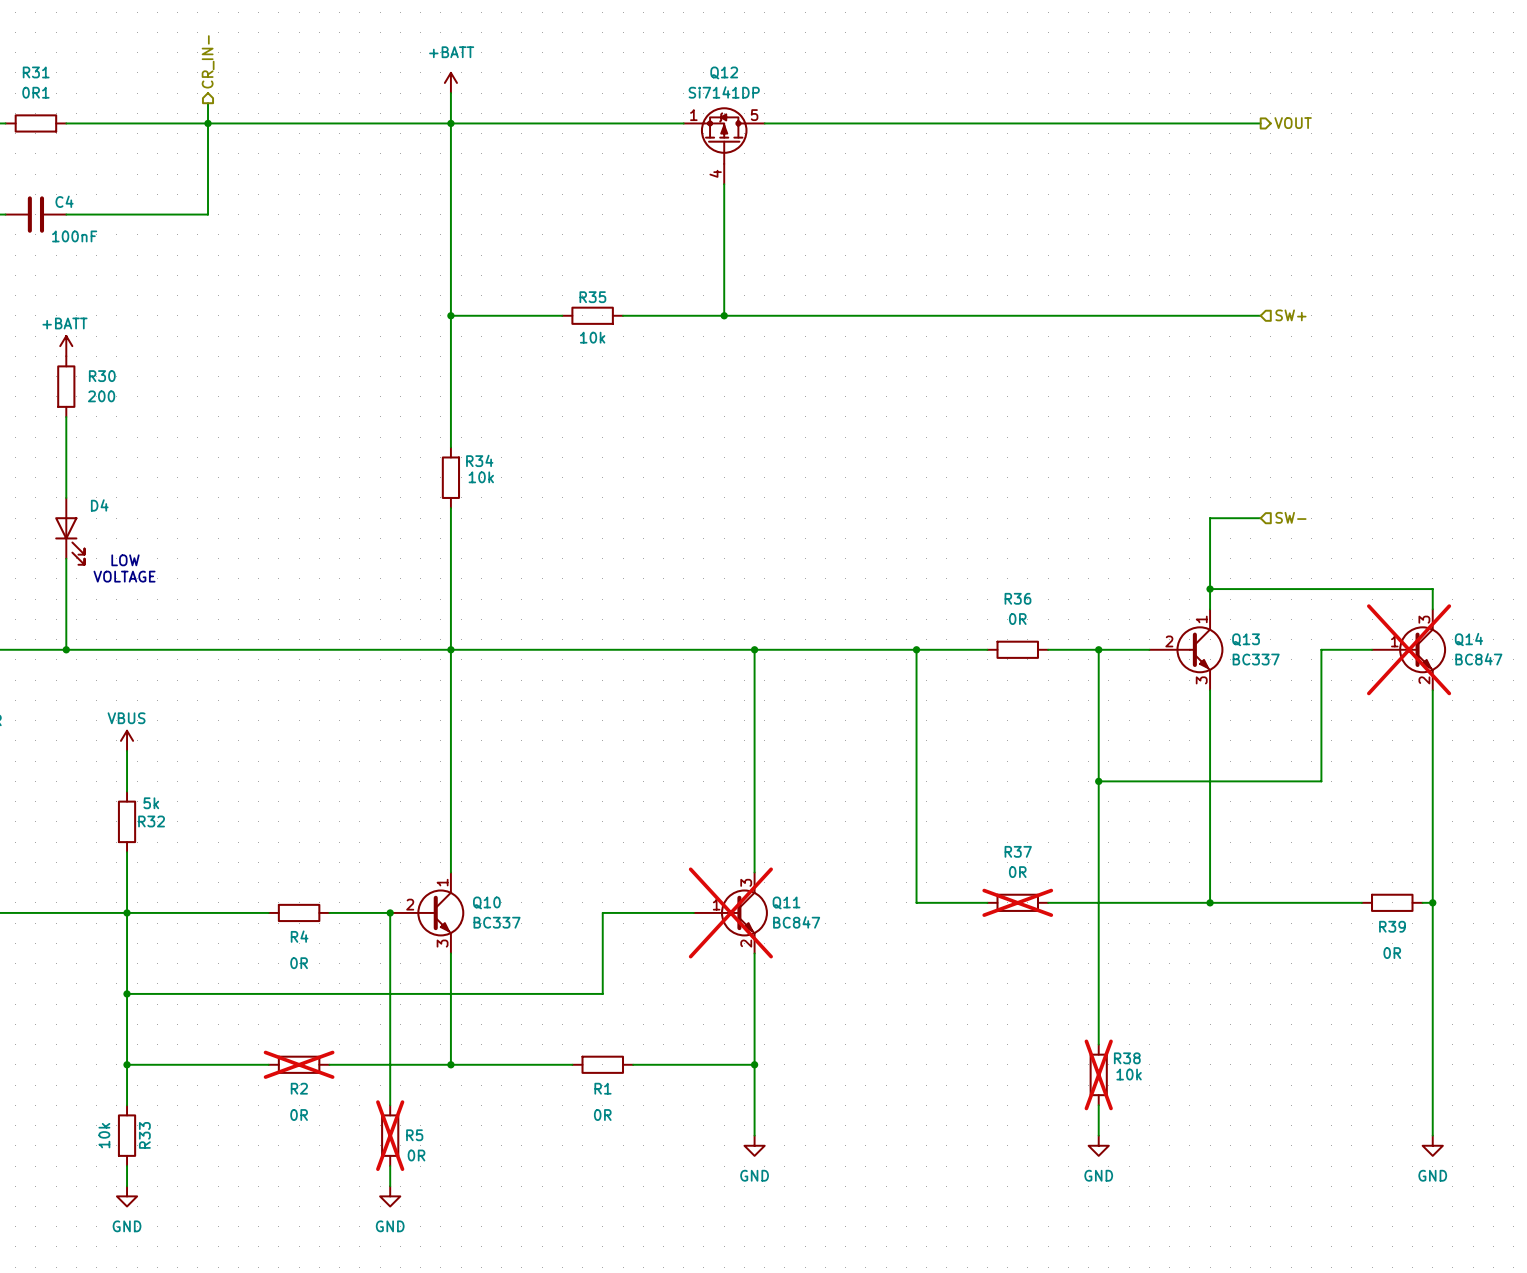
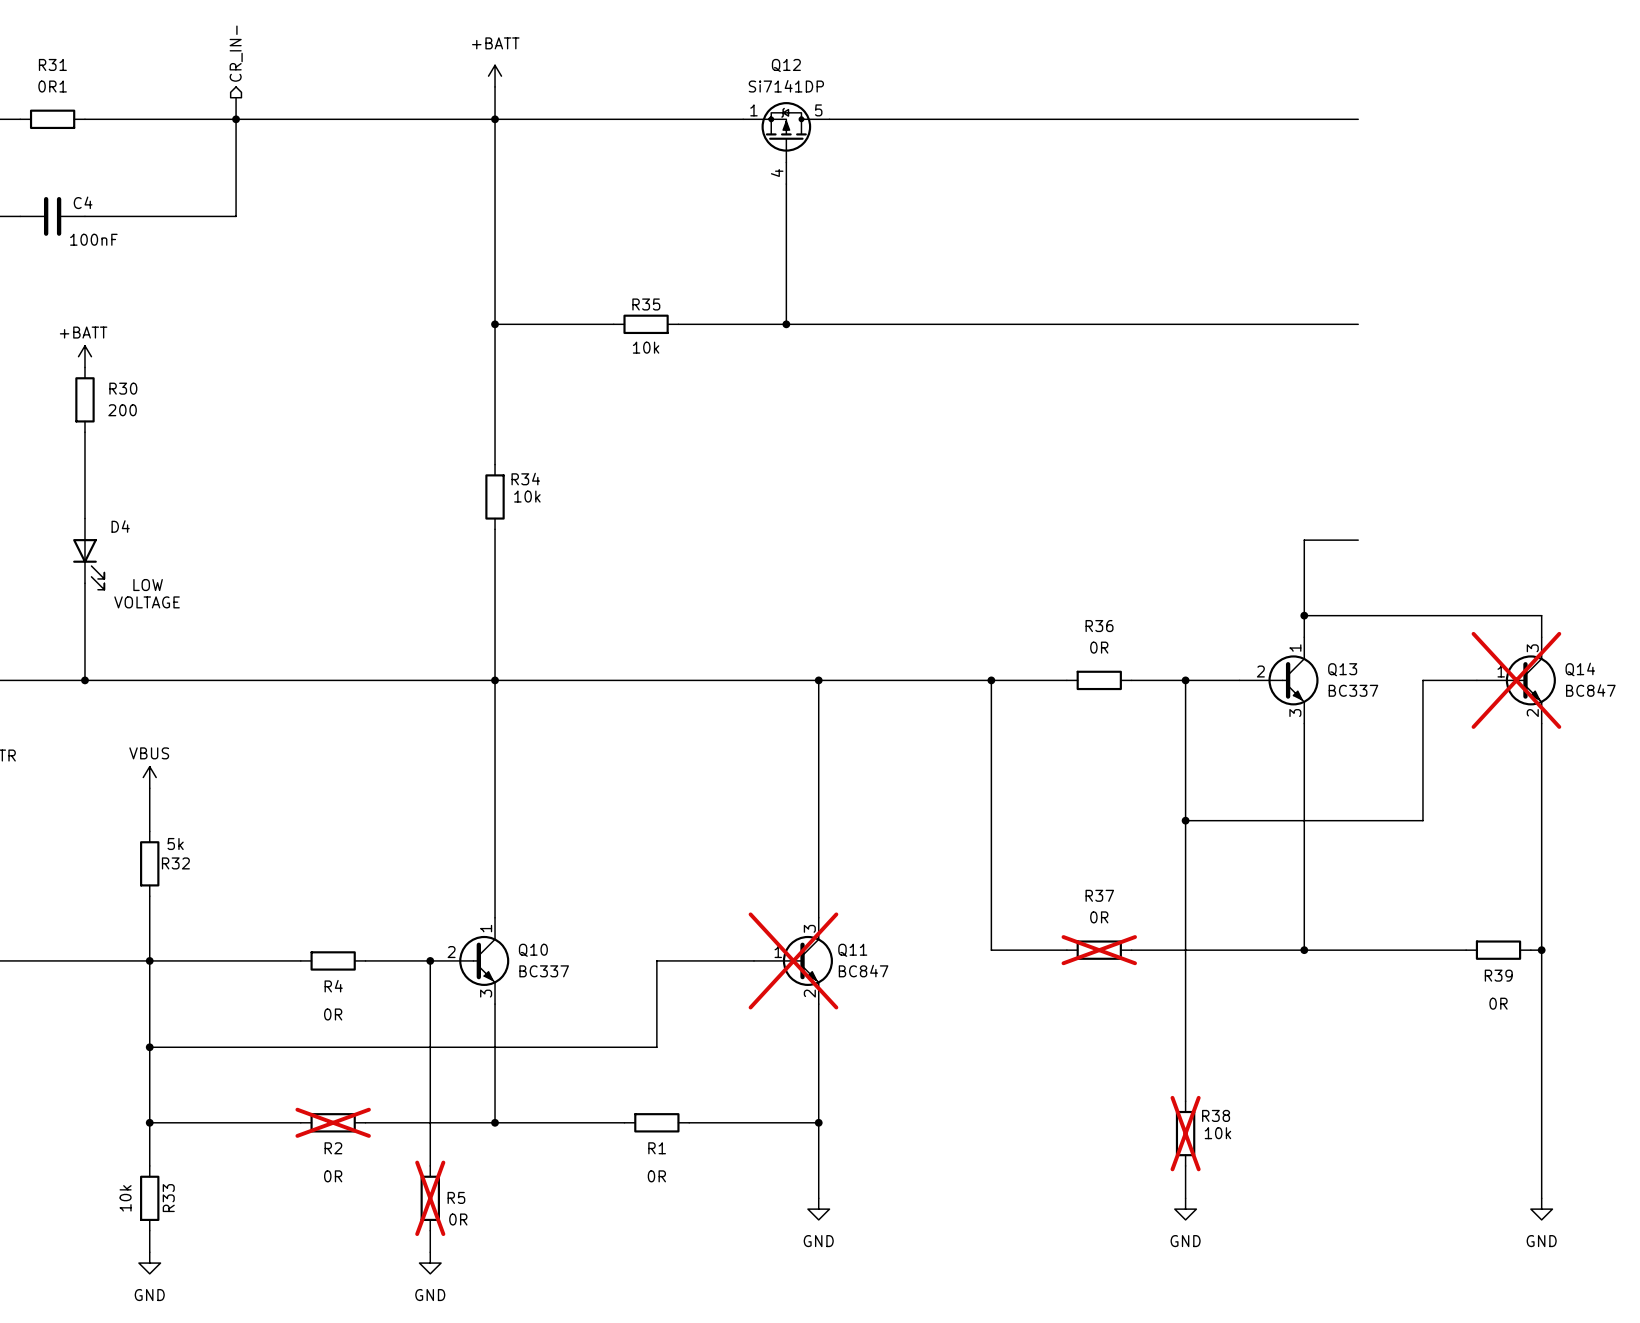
hierarchical label: VOUT (1293, 123) -> none
hierarchical label: SW+ (1290, 315) -> none
hierarchical label: SW- (1290, 517) -> none

